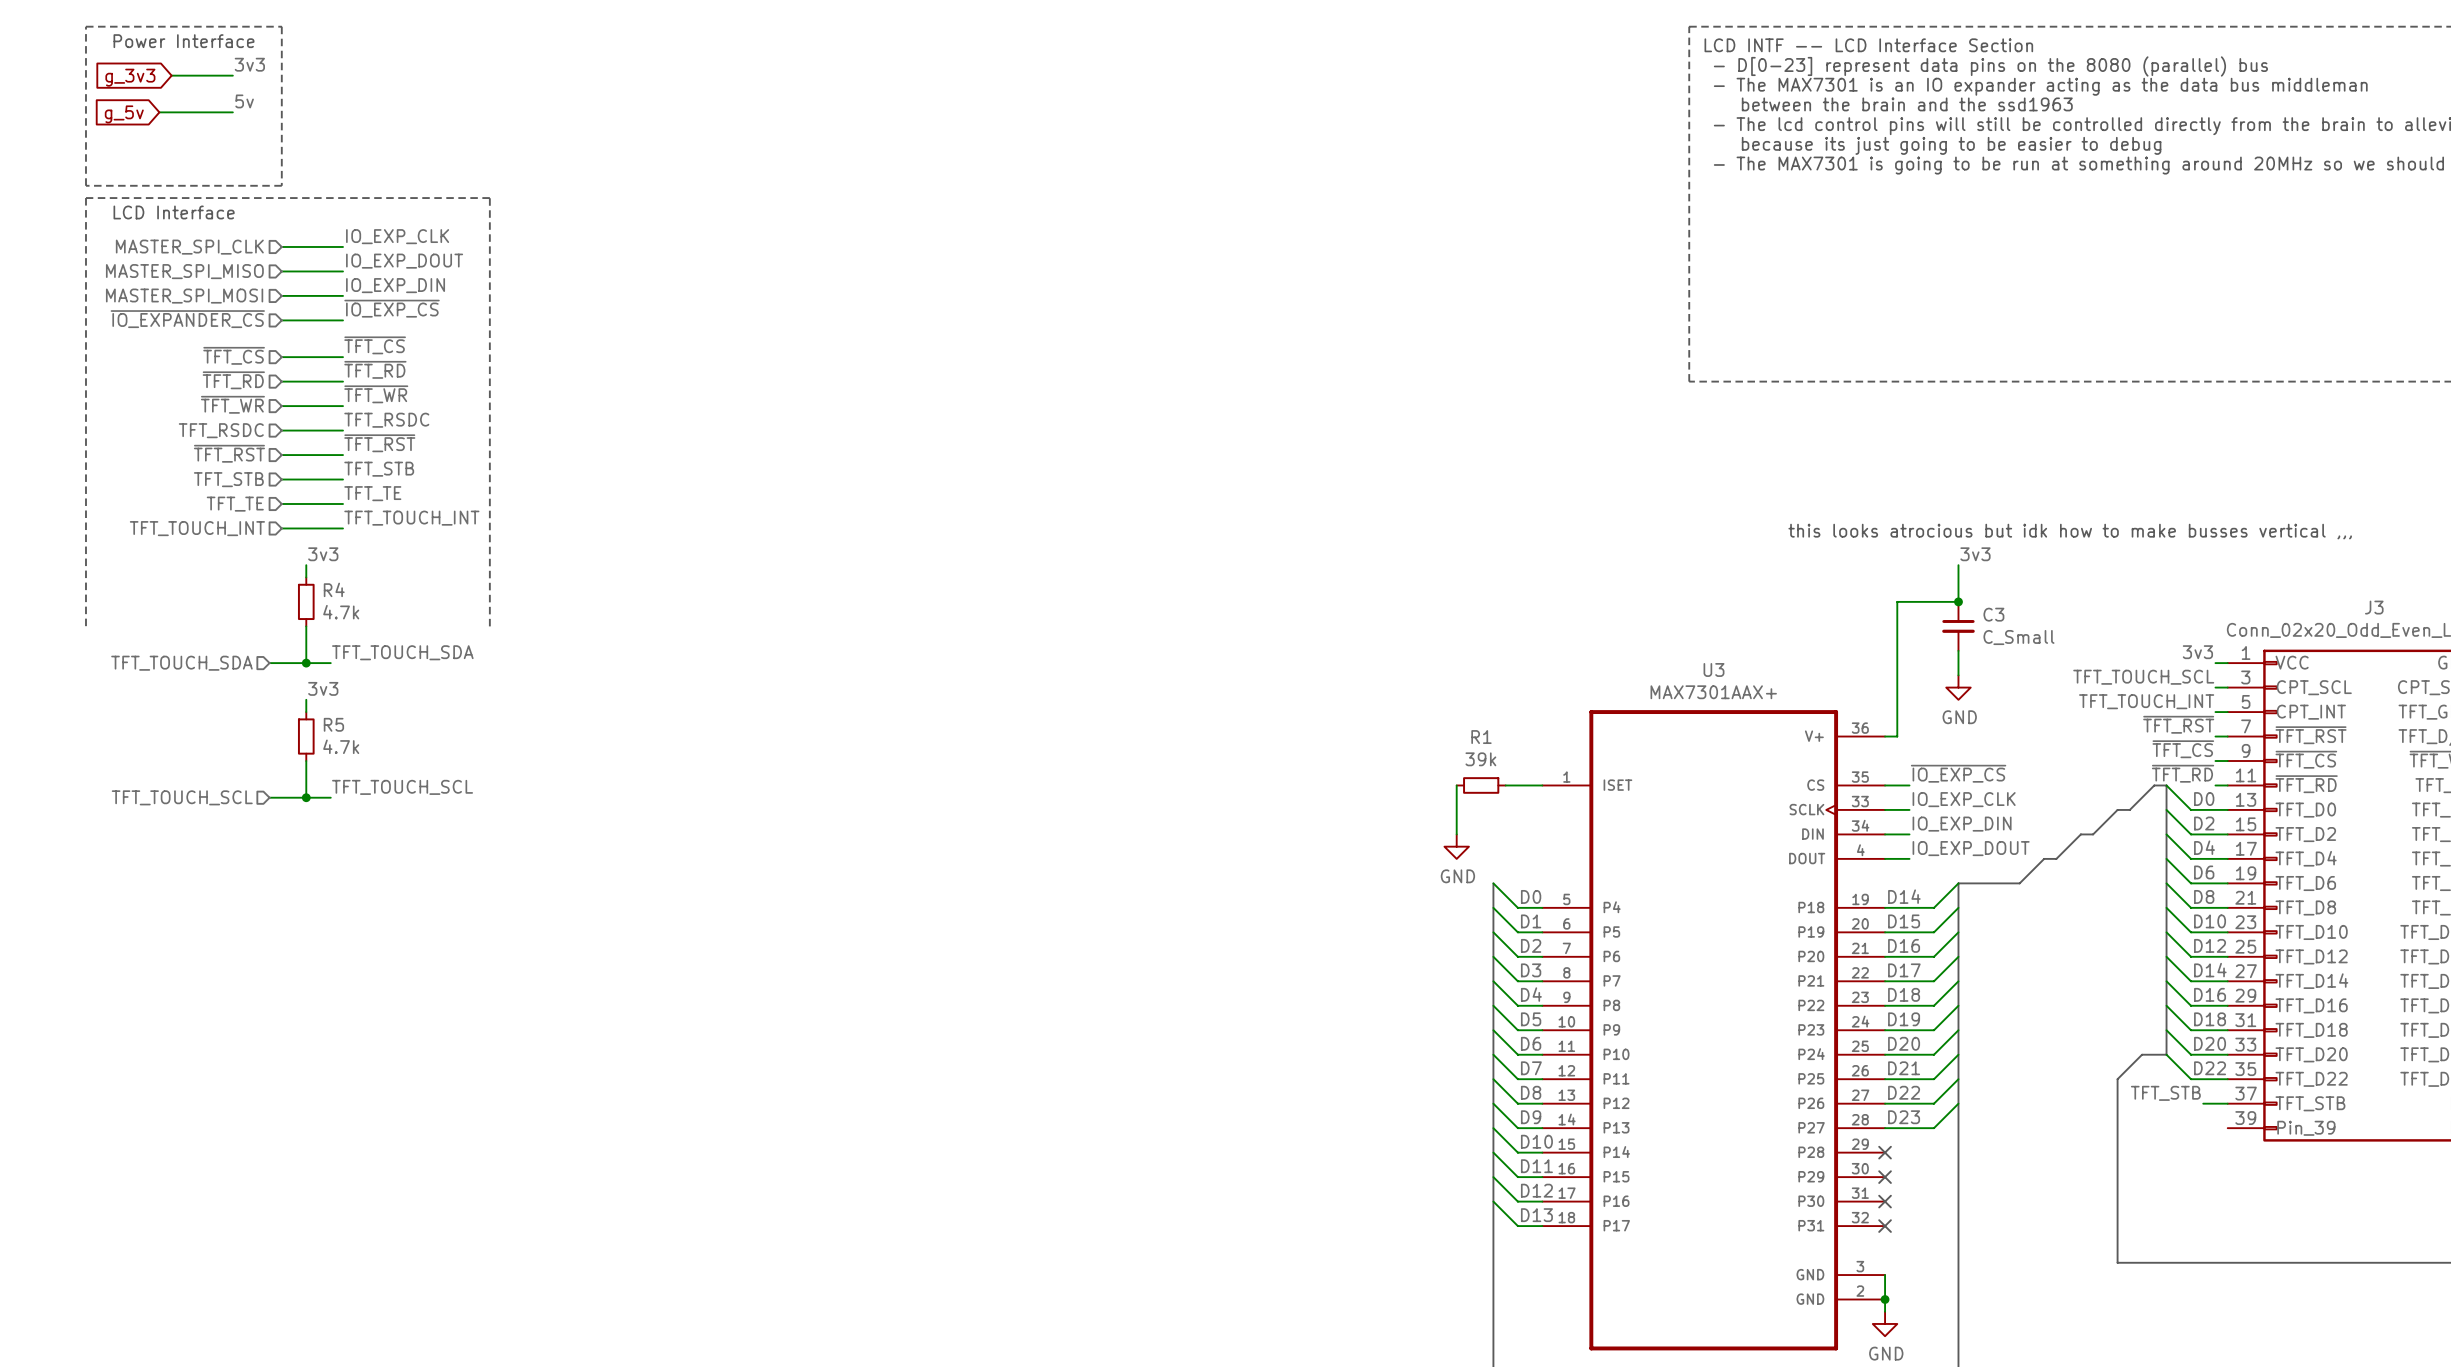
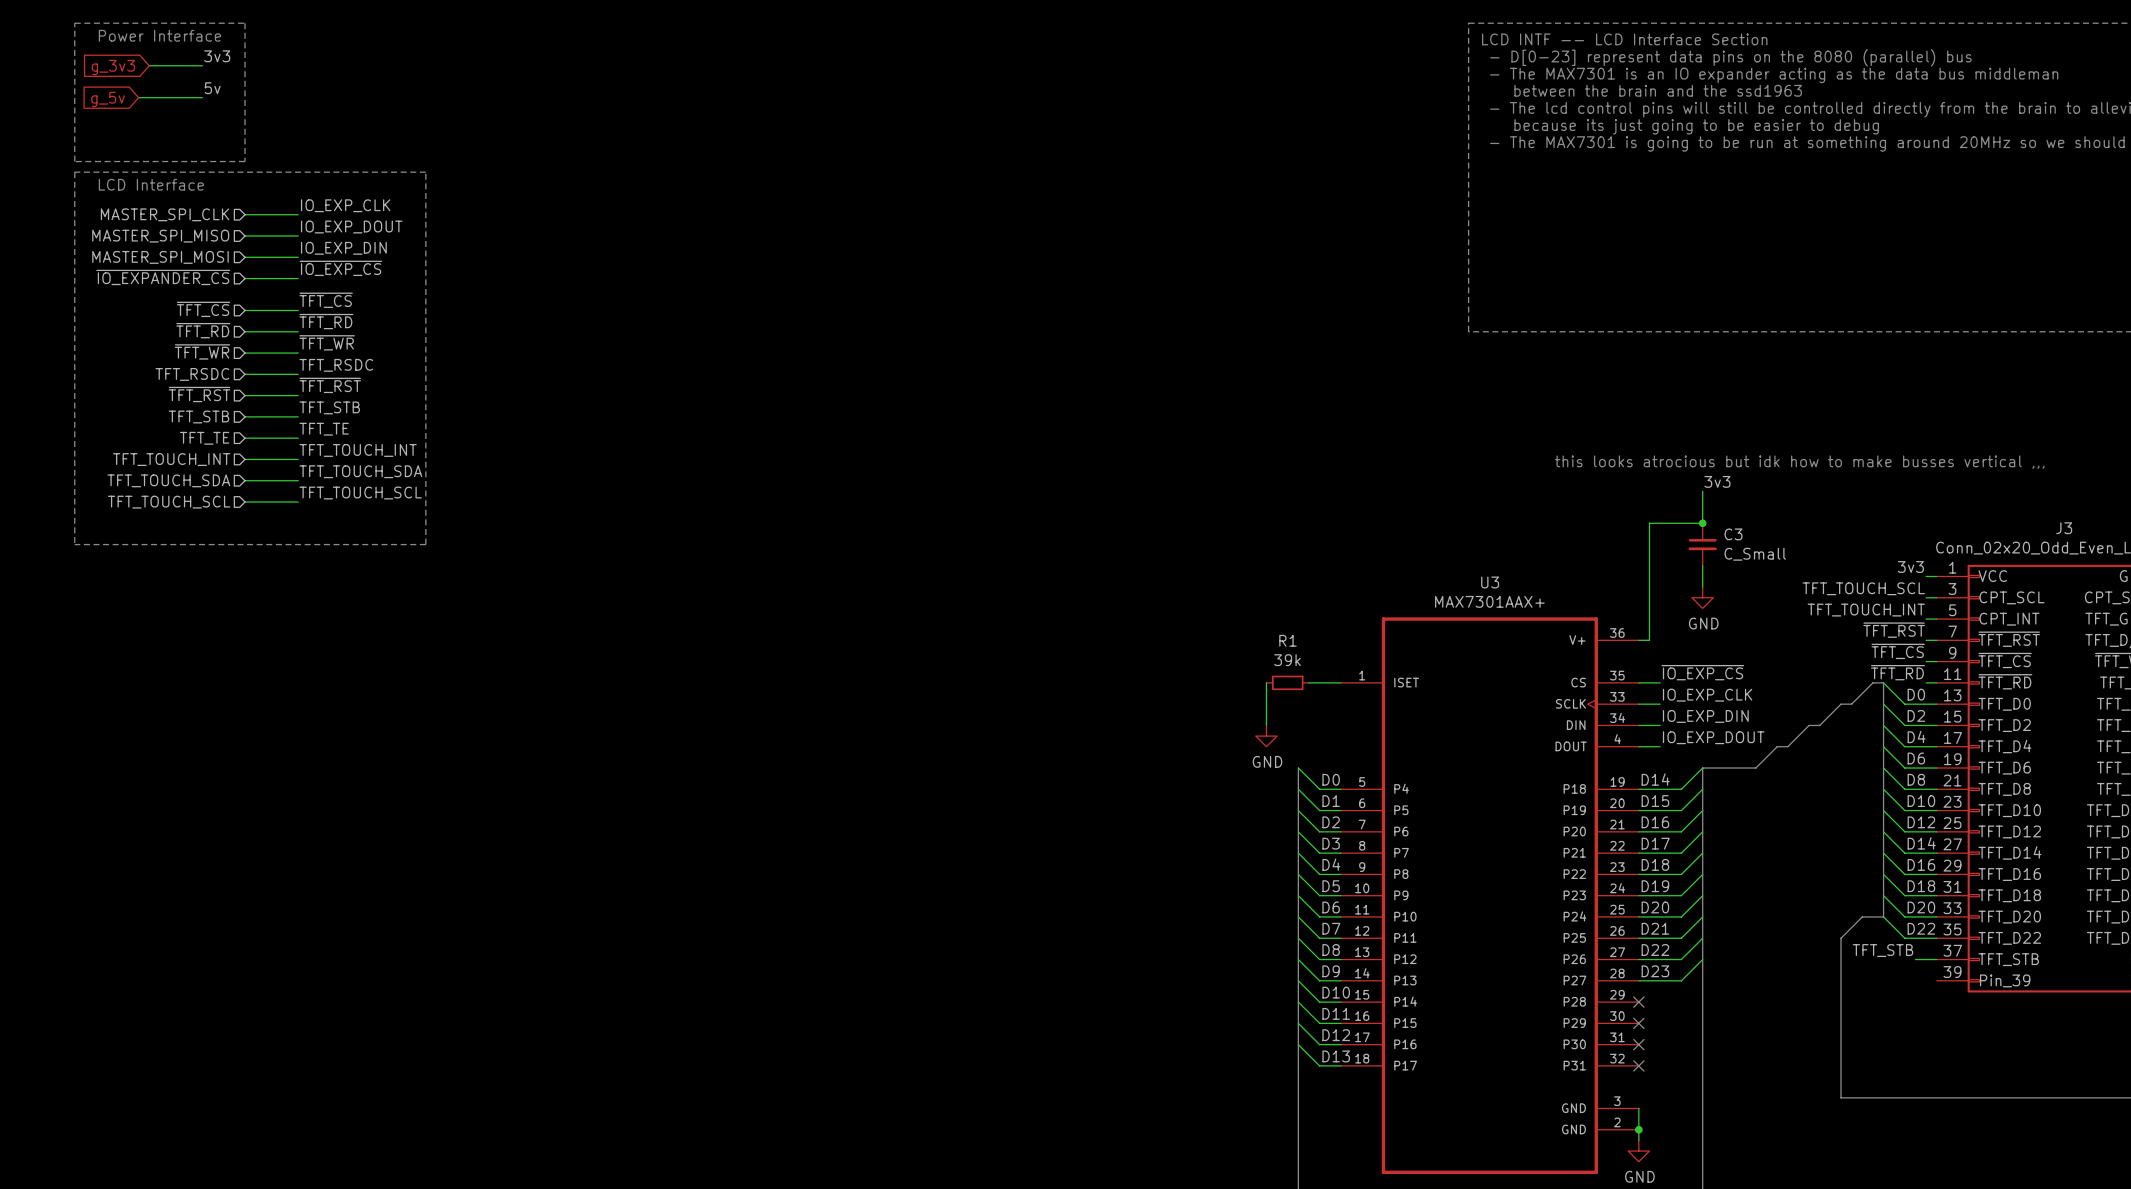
wire: none -> (245, 480) (298, 480)
label: 3v3 (323, 554) -> none
wire: (306, 565) (306, 577) -> none
R4: 4.7k (306, 601) -> none
line: none -> (74, 544) (425, 544)
wire: (306, 626) (306, 663) -> none
label position: TFT_TOUCH_SDA (402, 652) -> TFT_TOUCH_SDA (360, 471)
hierarchical label position: TFT_TOUCH_SDA (181, 663) -> TFT_TOUCH_SDA (168, 480)
wire: (269, 663) (330, 663) -> (245, 502) (298, 502)
junction: (306, 663) -> none
label: 3v3 (323, 688) -> none
wire: (306, 699) (306, 712) -> none
R5: 4.7k (306, 736) -> none
wire: (306, 761) (306, 797) -> none
label position: TFT_TOUCH_SCL (402, 787) -> TFT_TOUCH_SCL (360, 493)
hierarchical label position: TFT_TOUCH_SCL (182, 797) -> TFT_TOUCH_SCL (169, 502)
wire: (269, 797) (330, 797) -> none
junction: (306, 797) -> none

